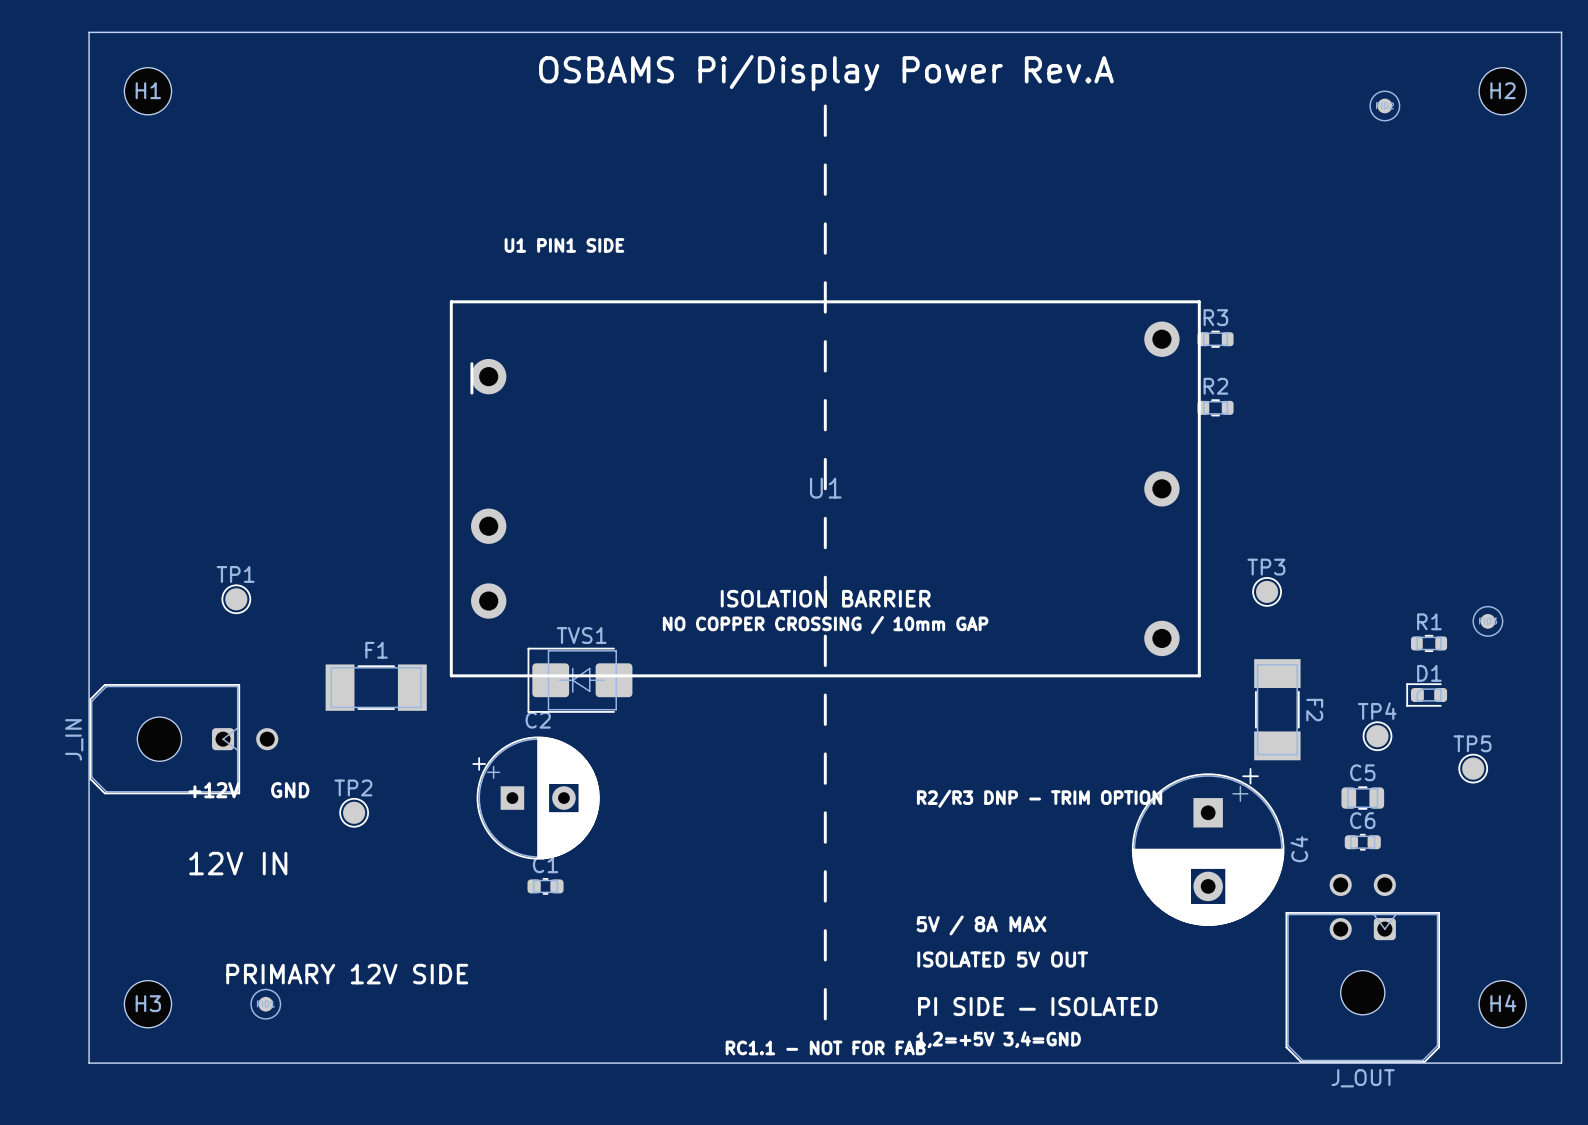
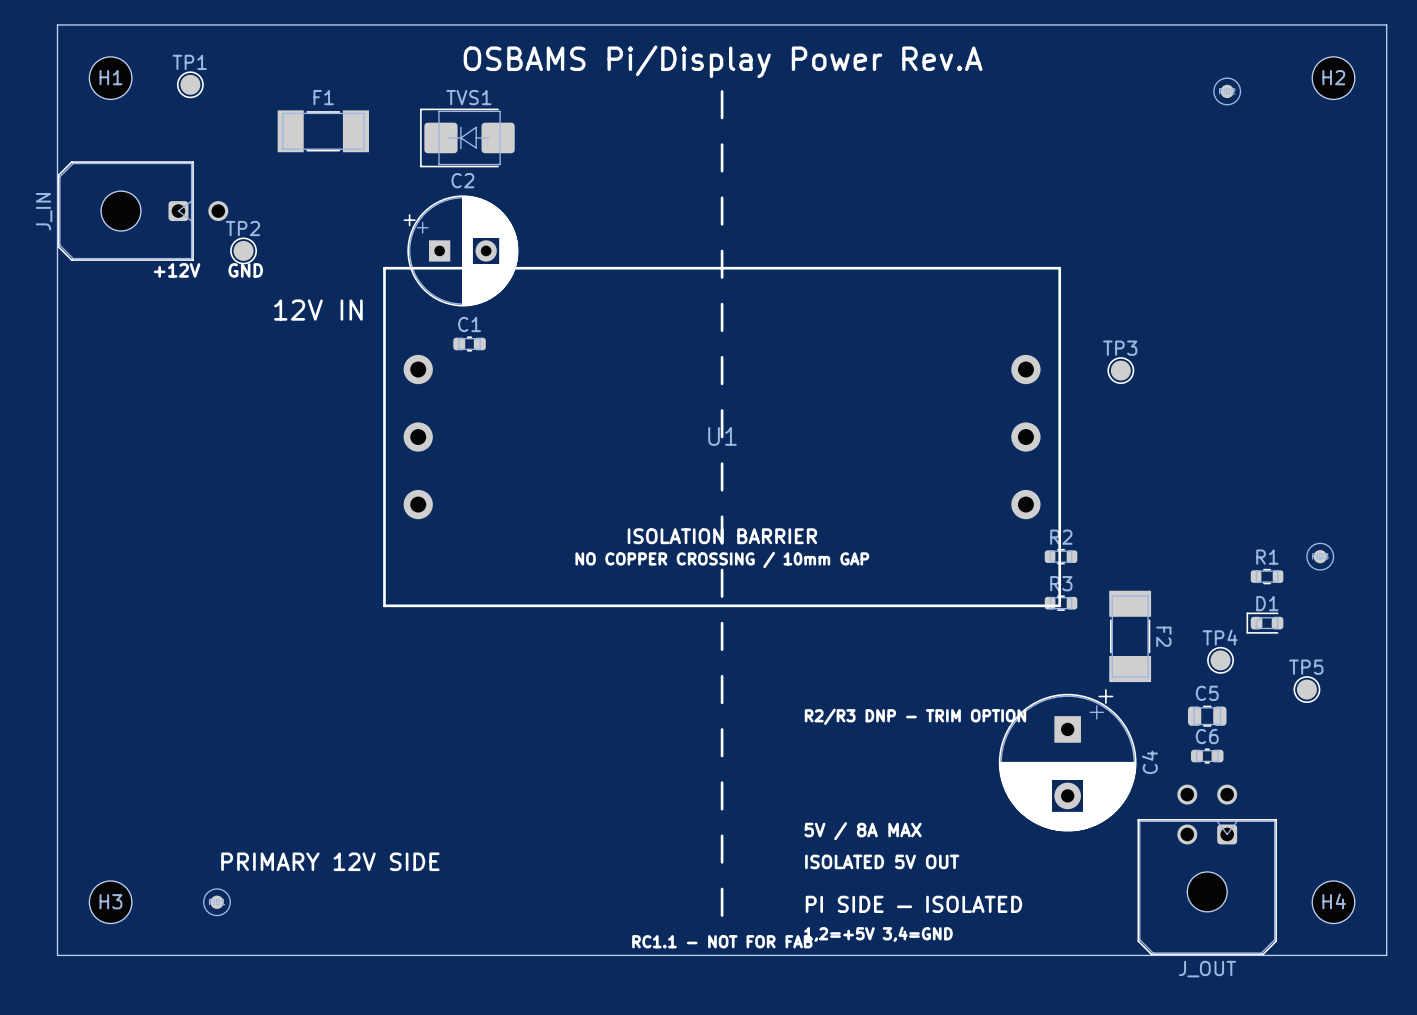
J_IN: none -> (142, 211)
text: U1 PIN1 SIDE (564, 245) -> none
U1 footprint: [449, 300, 1201, 678] -> [383, 266, 1062, 608]
text: none -> +12V GND (208, 270)
R3 position: (1215, 339) -> (1061, 603)
text: none -> 12V IN (318, 310)
R2 position: (1215, 407) -> (1061, 556)
TP3 position: (1267, 591) -> (1120, 370)
TP1 position: (236, 599) -> (190, 84)
TVS1 position: (580, 680) -> (467, 137)
F1 position: (376, 687) -> (323, 131)
J_IN: (183, 739) -> none
text: +12V GND (248, 790) -> none
C2 position: (536, 798) -> (460, 250)
TP2 position: (354, 812) -> (243, 250)
text: 12V IN (238, 863) -> none
C1 position: (545, 886) -> (469, 343)
text position: PRIMARY 12V SIDE (347, 974) -> PRIMARY 12V SIDE (330, 861)

